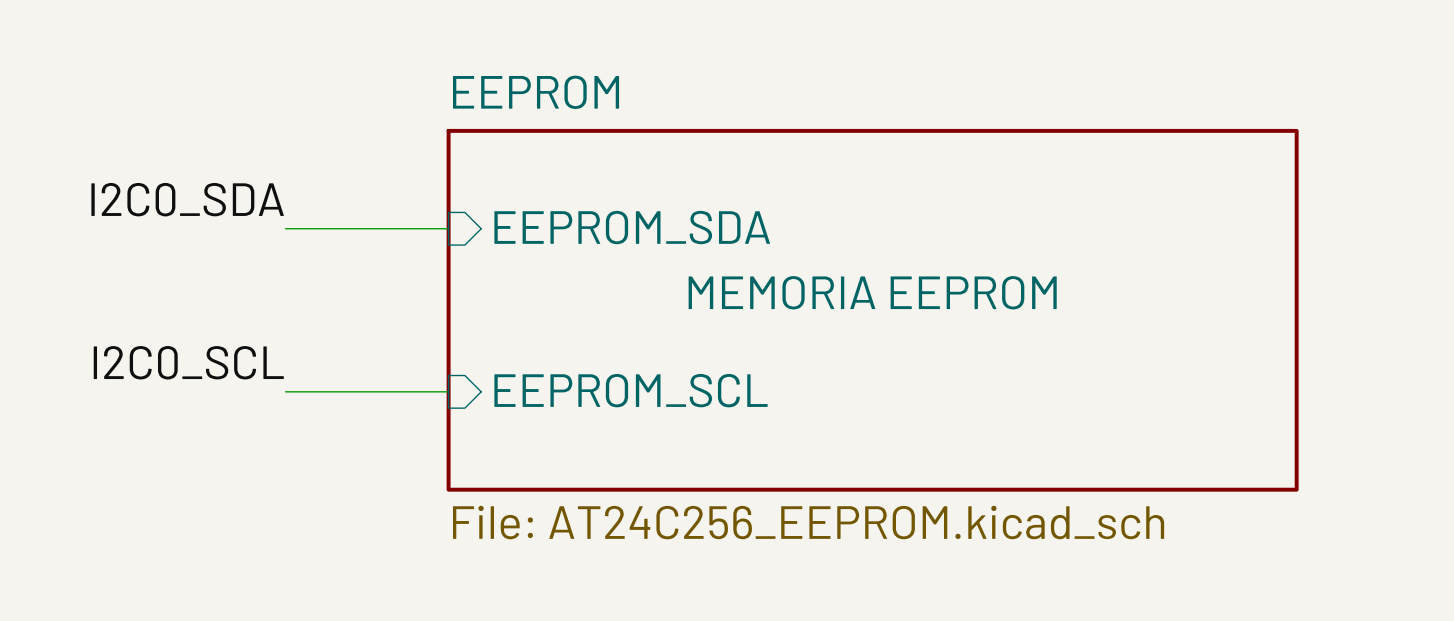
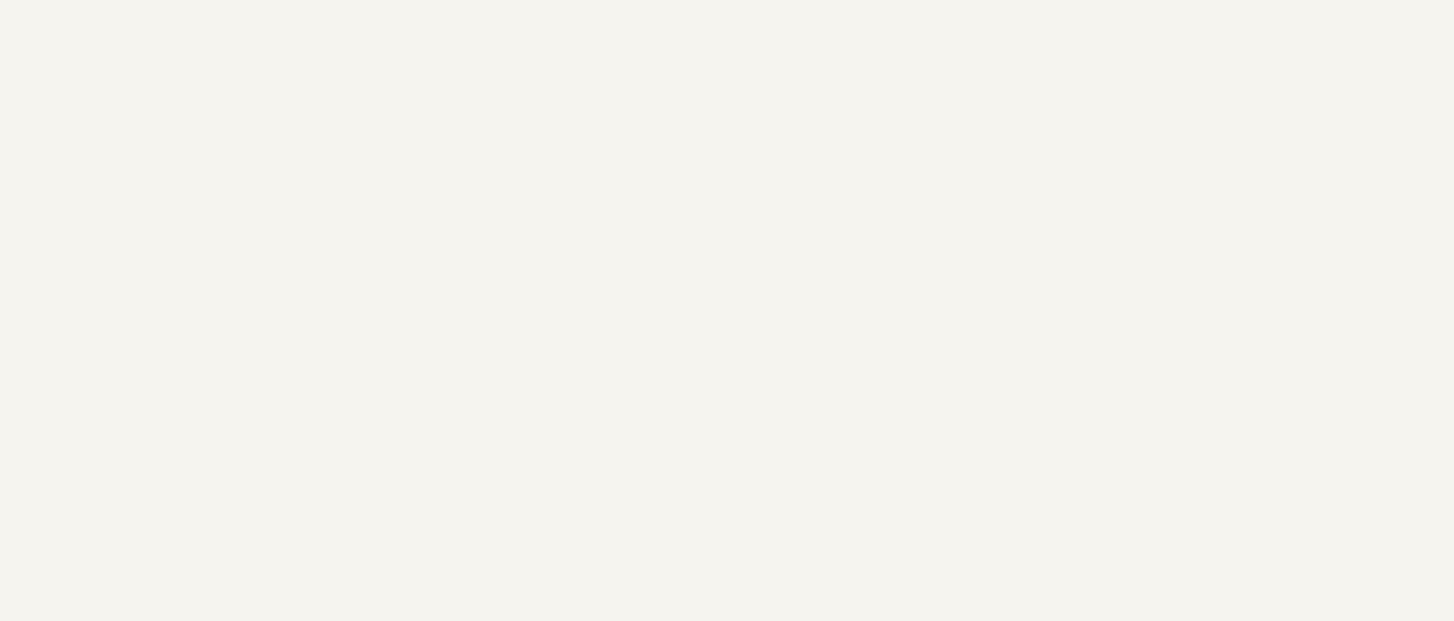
label: I2C0_SDA (187, 199) -> none
sheet pin: EEPROM_SDA (632, 227) -> none
wire: (285, 228) (448, 228) -> none
sheet EEPROM: File: AT24C256_EEPROM.kicad_sch (872, 310) -> none
label: I2C0_SCL (188, 362) -> none
sheet pin: EEPROM_SCL (631, 390) -> none
wire: (285, 391) (448, 391) -> none

